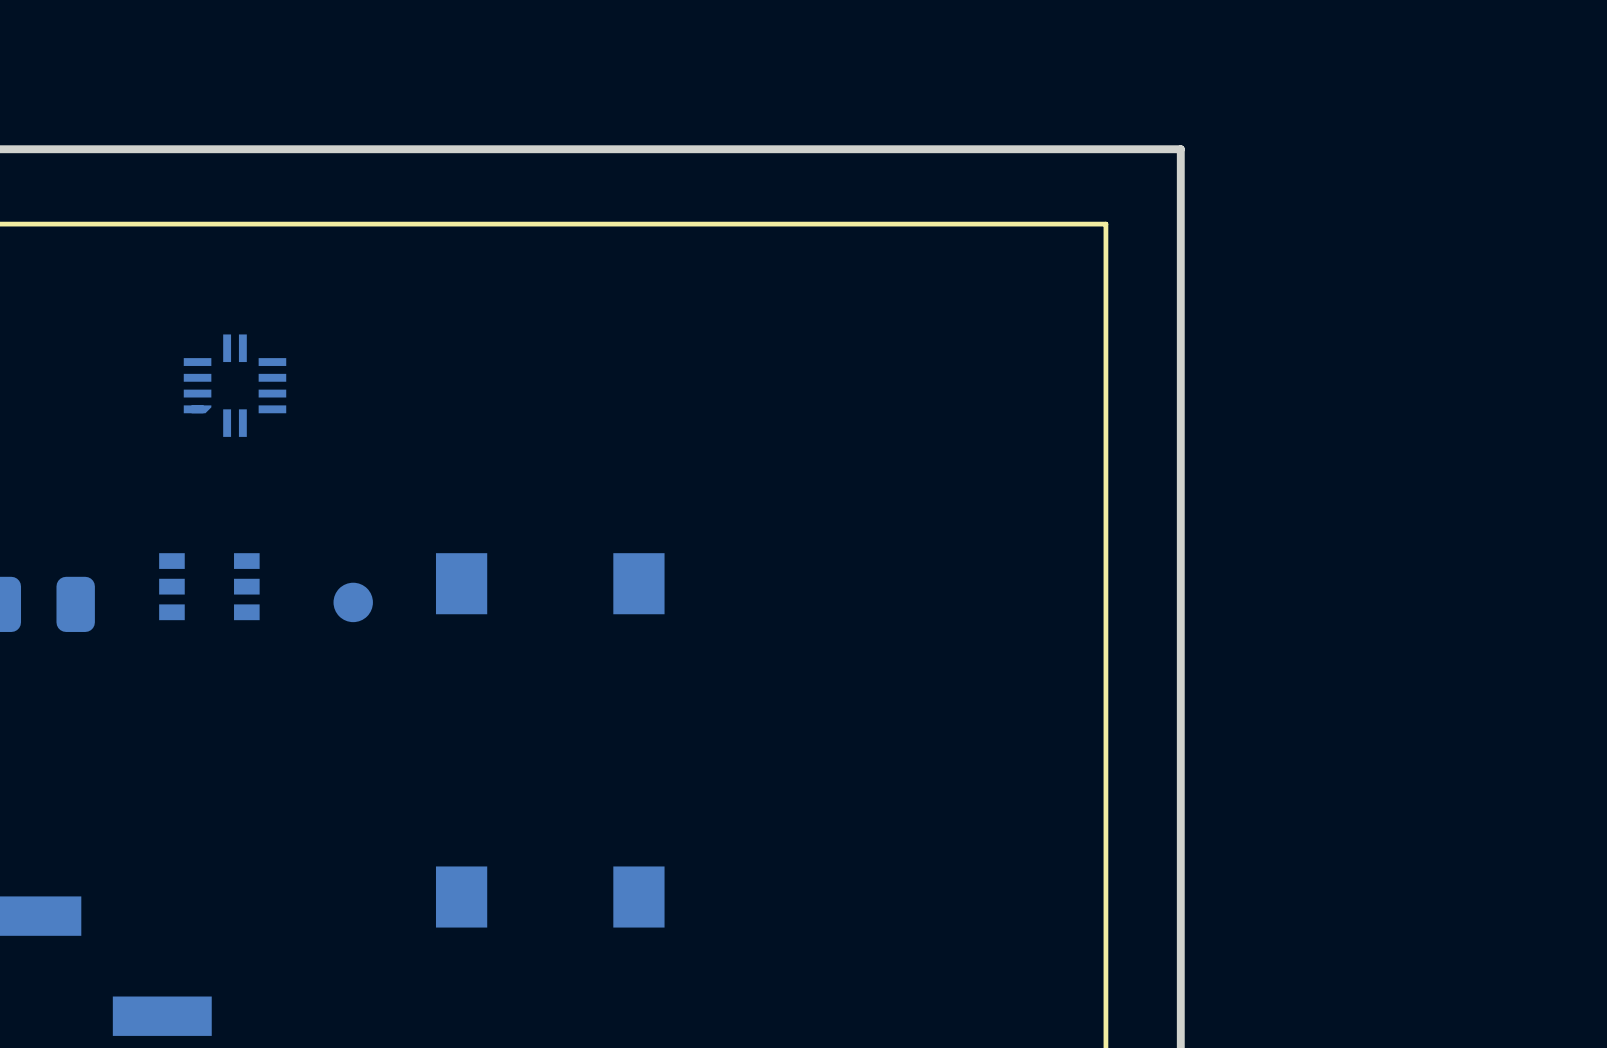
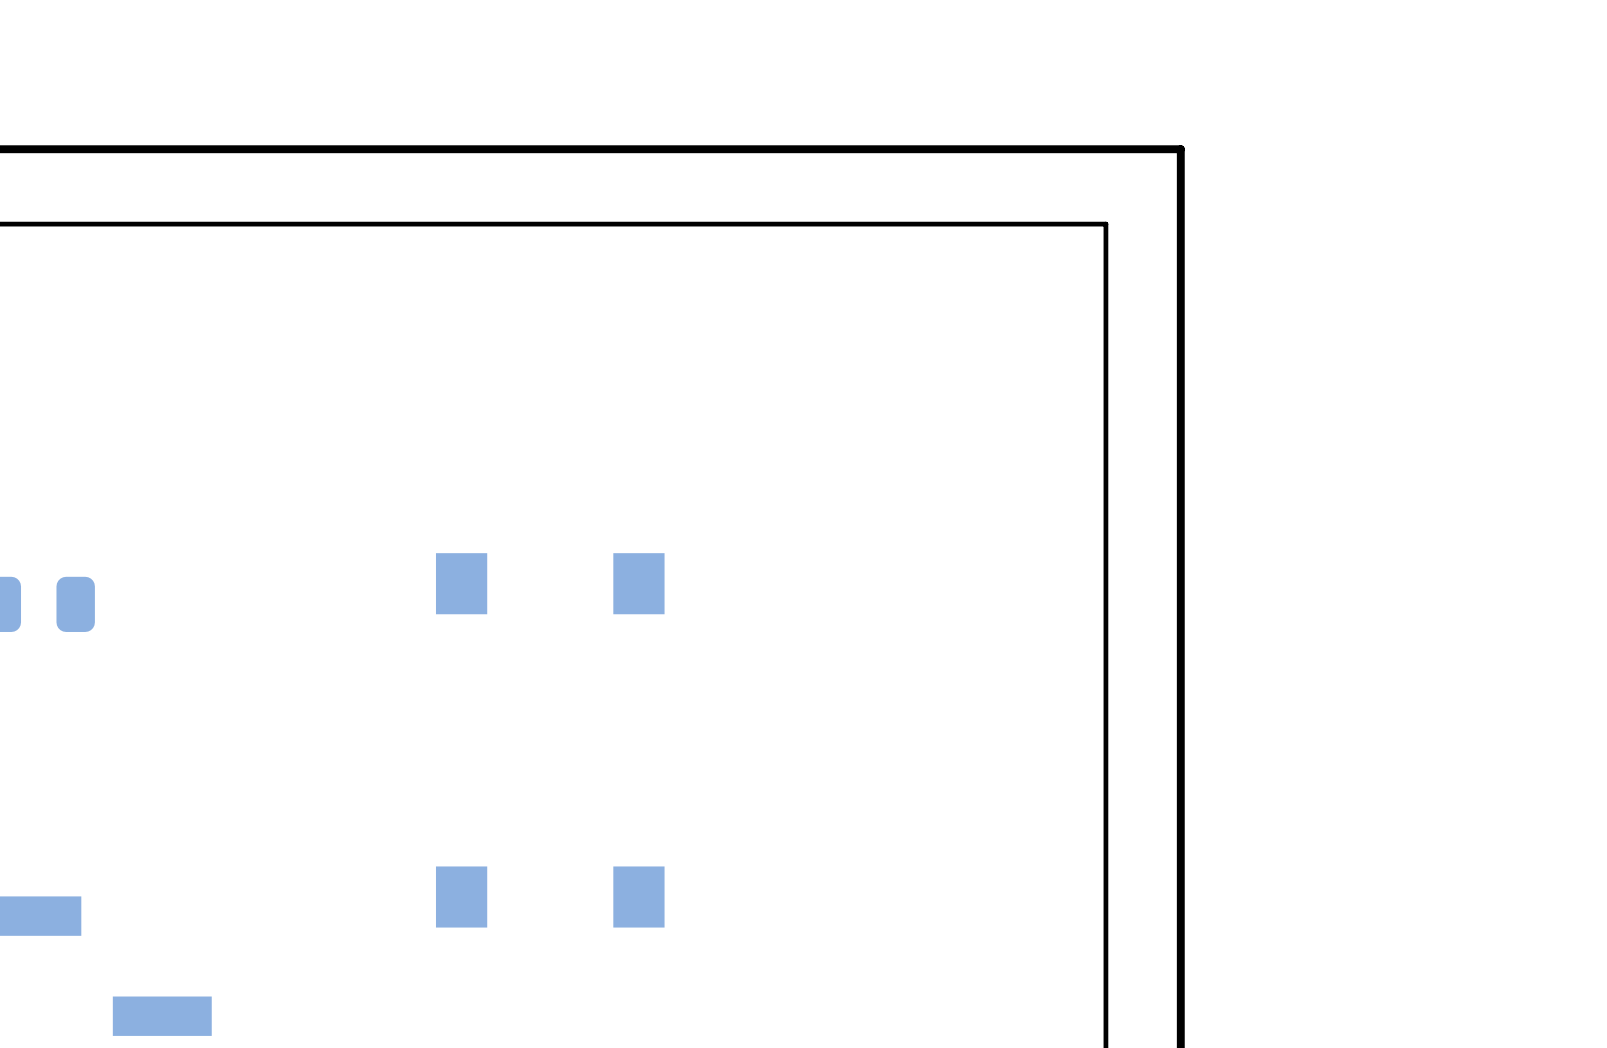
part: (235, 385) -> none
part: (209, 586) -> none
part: (353, 602) -> none

